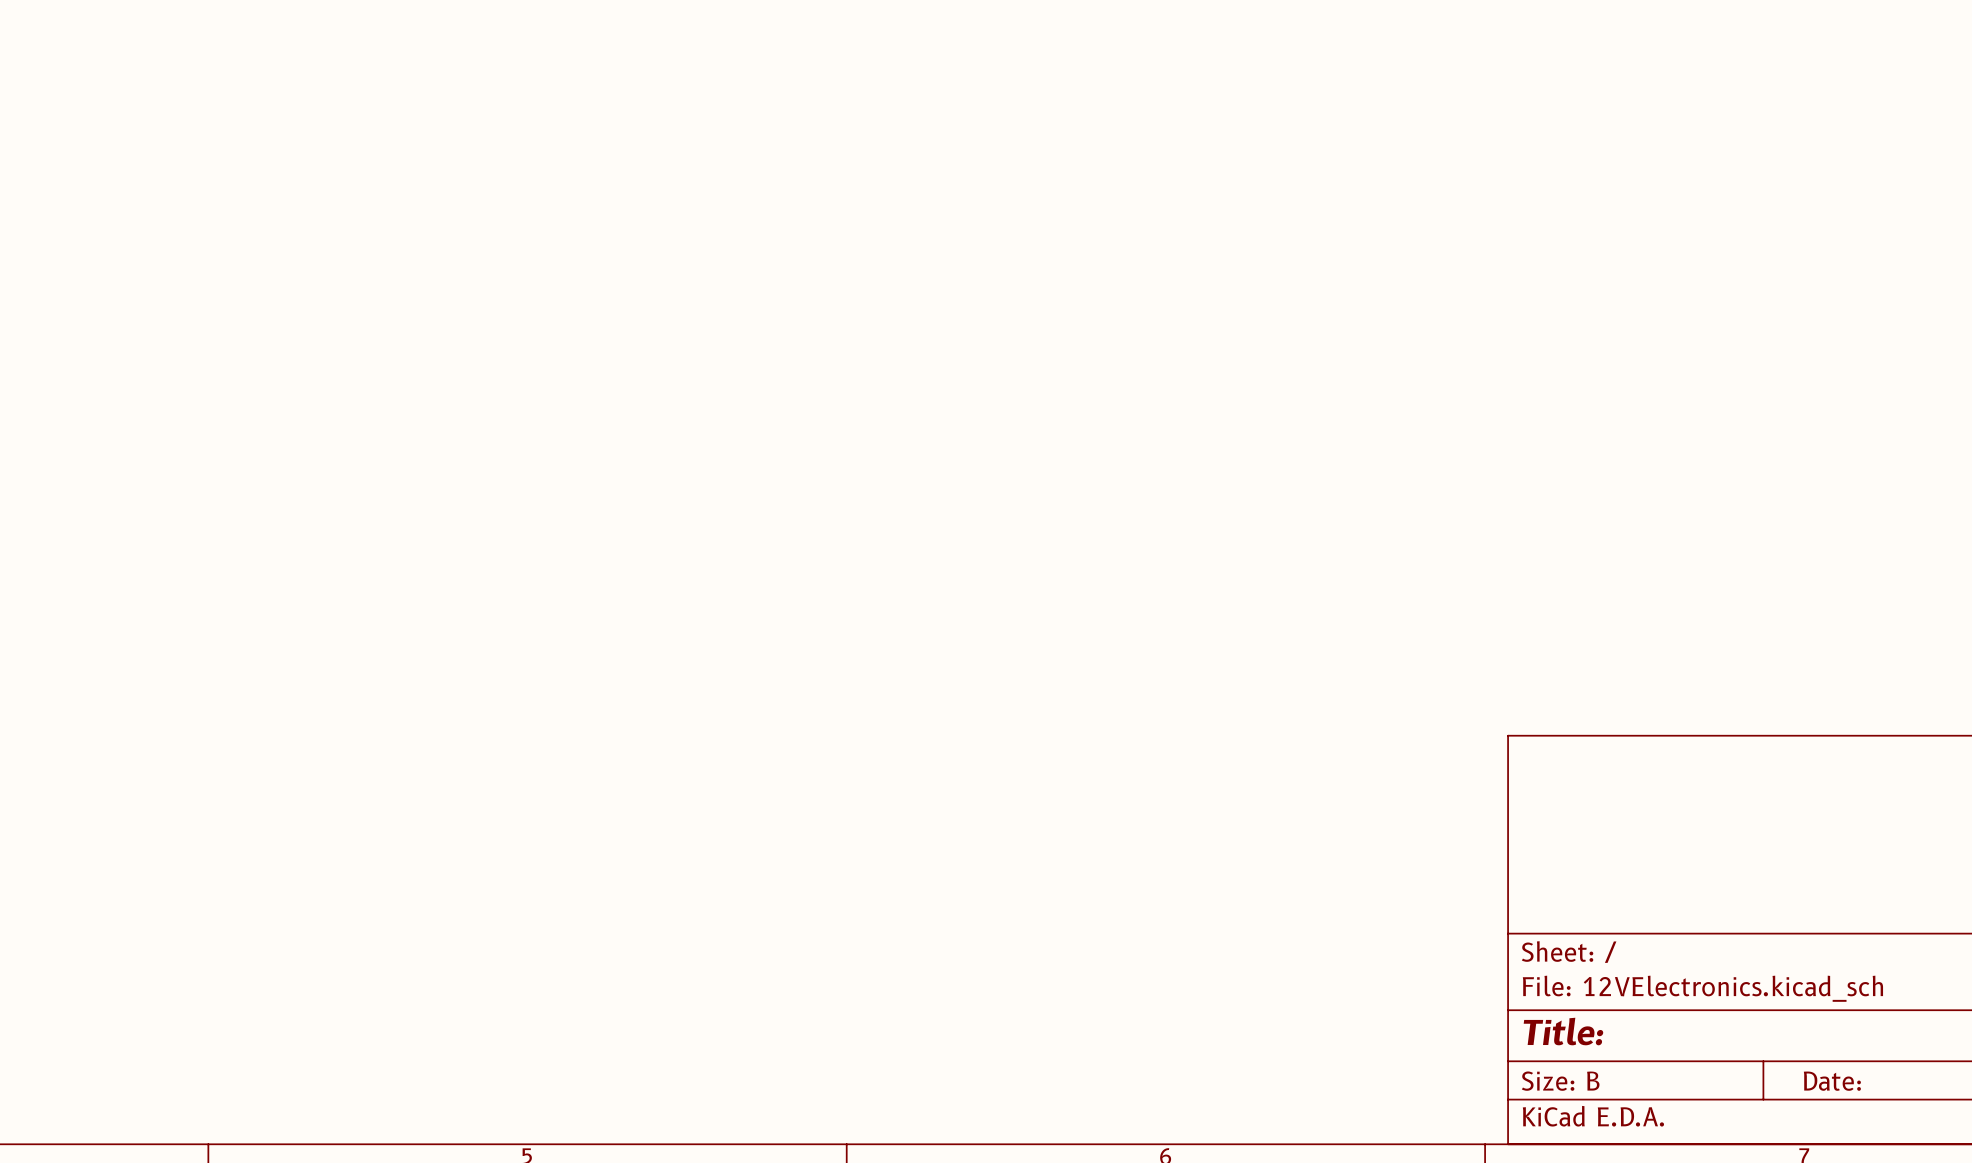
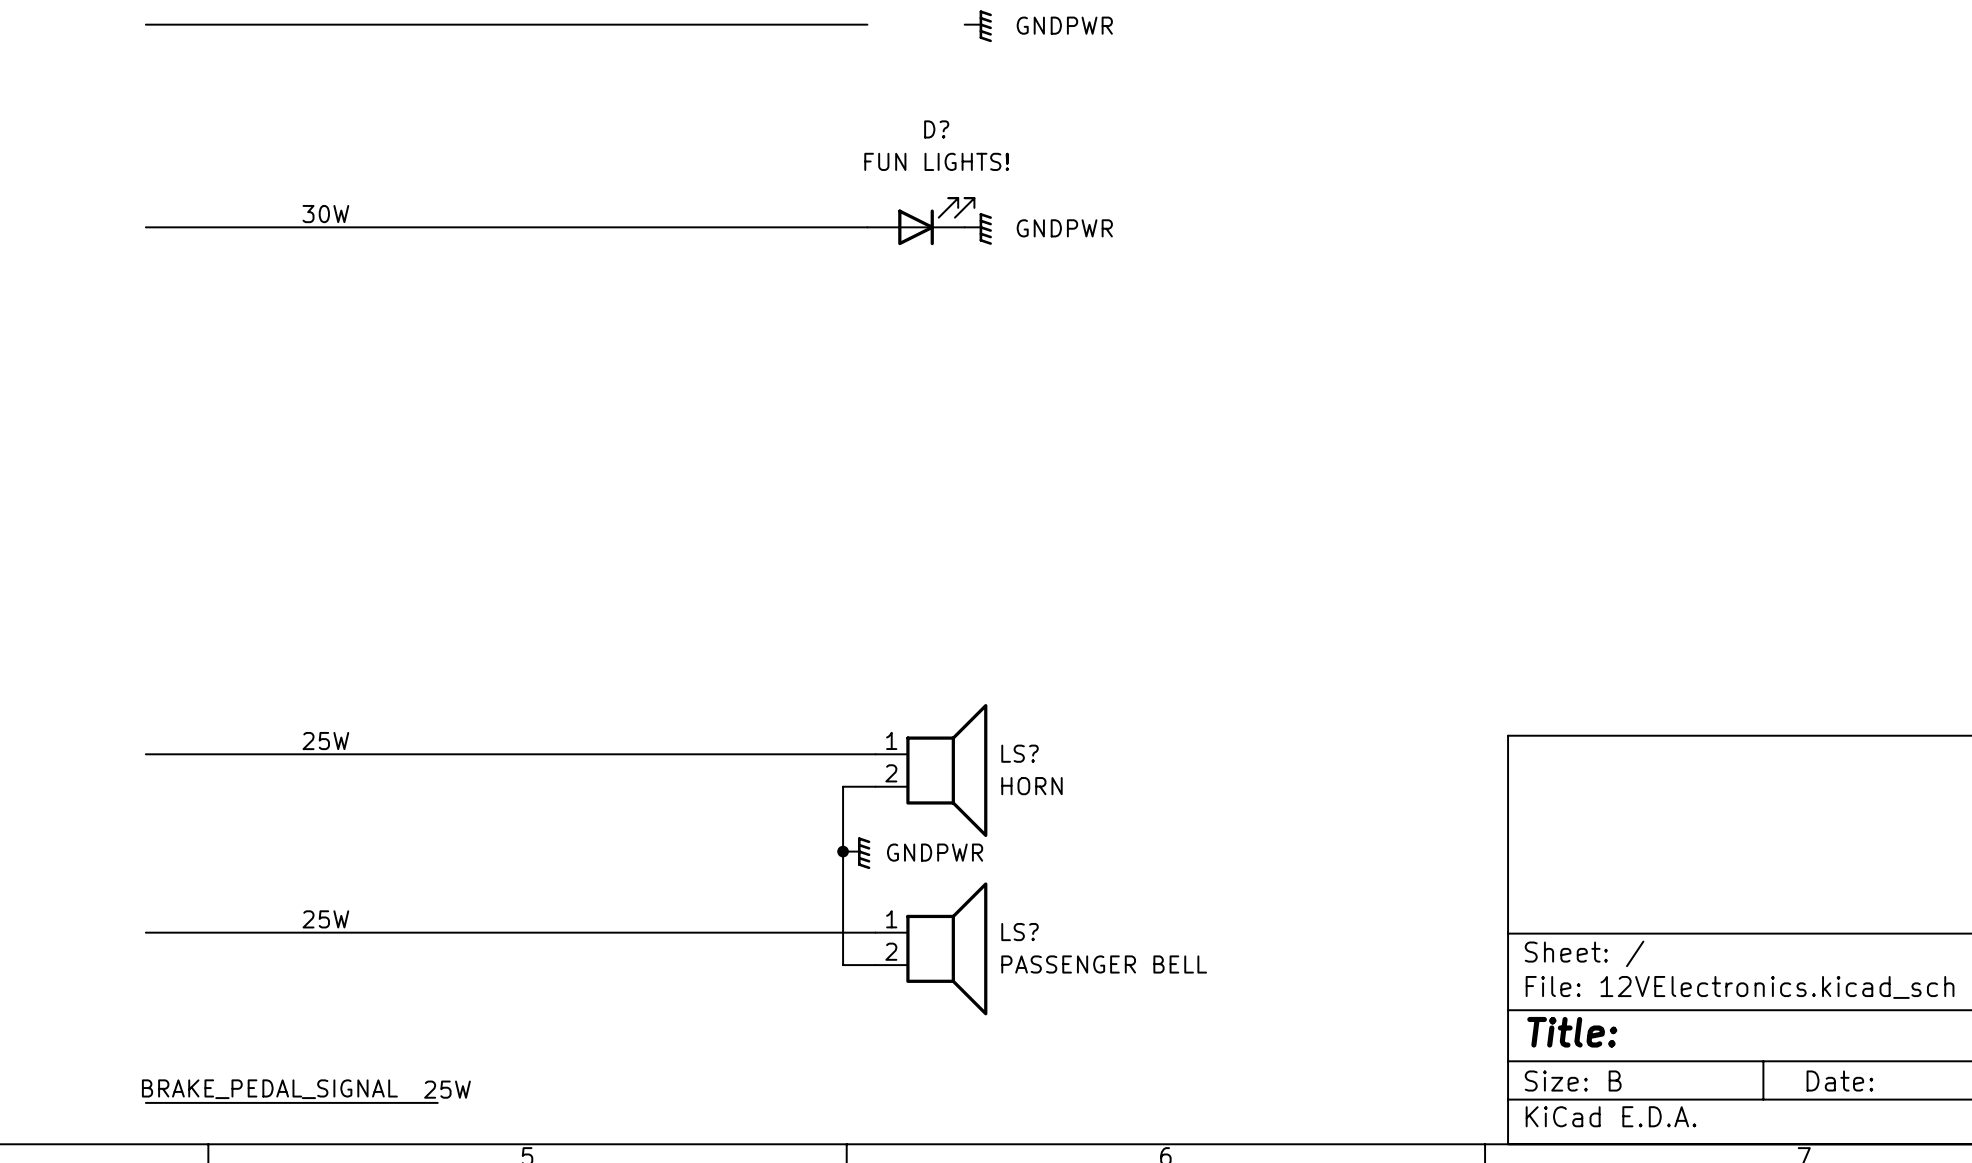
wire: none -> (145, 24) (867, 24)
power symbol: none -> GNDPWR (978, 26)
text: none -> 30W (325, 214)
D?: none -> FUN LIGHTS! (920, 221)
wire: none -> (145, 227) (867, 227)
power symbol: none -> GNDPWR (978, 228)
text: none -> 25W (325, 741)
wire: none -> (145, 754) (875, 754)
LS?: none -> HORN (931, 770)
wire: none -> (875, 786) (843, 786) (843, 965) (875, 965)
junction: none -> (843, 851)
power symbol: none -> GNDPWR (856, 853)
text: none -> 25W (325, 919)
wire: none -> (145, 932) (875, 932)
LS?: none -> PASSENGER BELL (931, 948)
text: none -> 25W (447, 1089)
label: none -> BRAKE_PEDAL_SIGNAL (269, 1089)
wire: none -> (145, 1102) (437, 1102)

